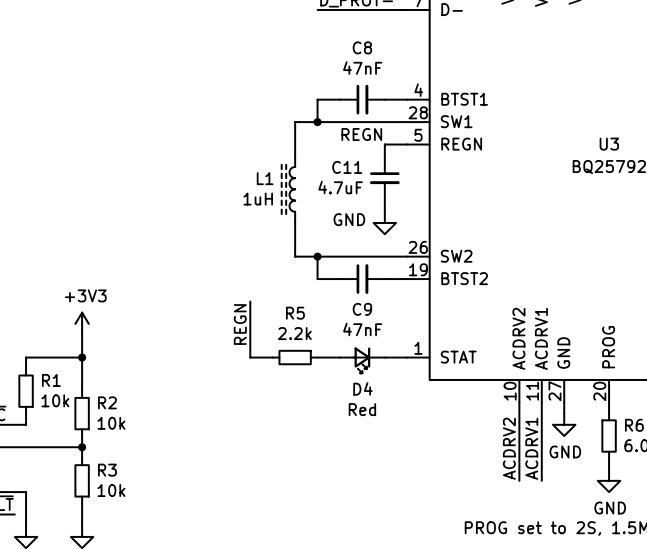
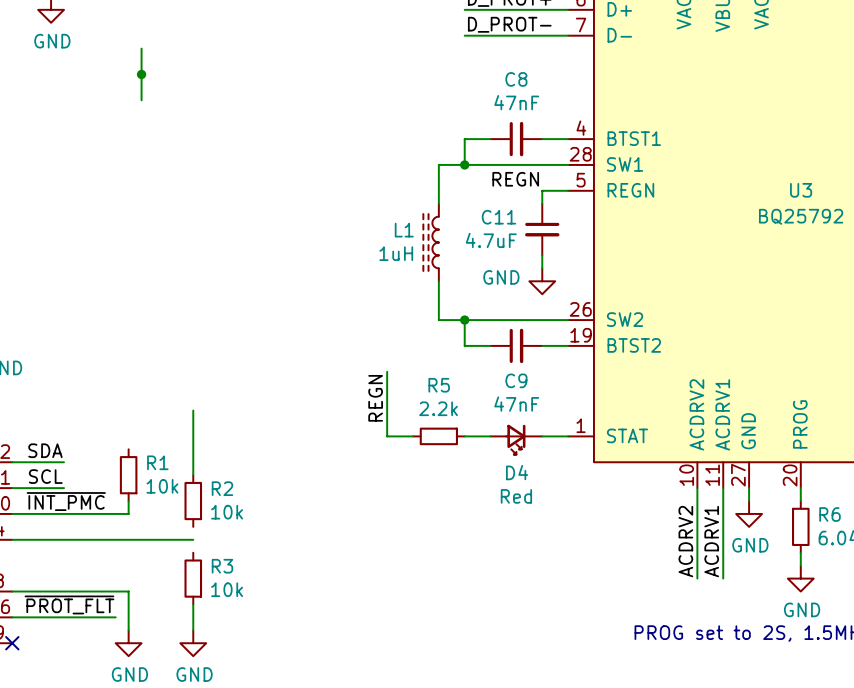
wire: none -> (141, 48) (141, 100)
junction: none -> (141, 74)
power symbol: +3V3 (82, 323) -> none
wire: (82, 357) (26, 357) (26, 368) -> none
junction: (82, 357) -> none
wire: (82, 436) (82, 458) -> none
junction: (82, 447) -> none

